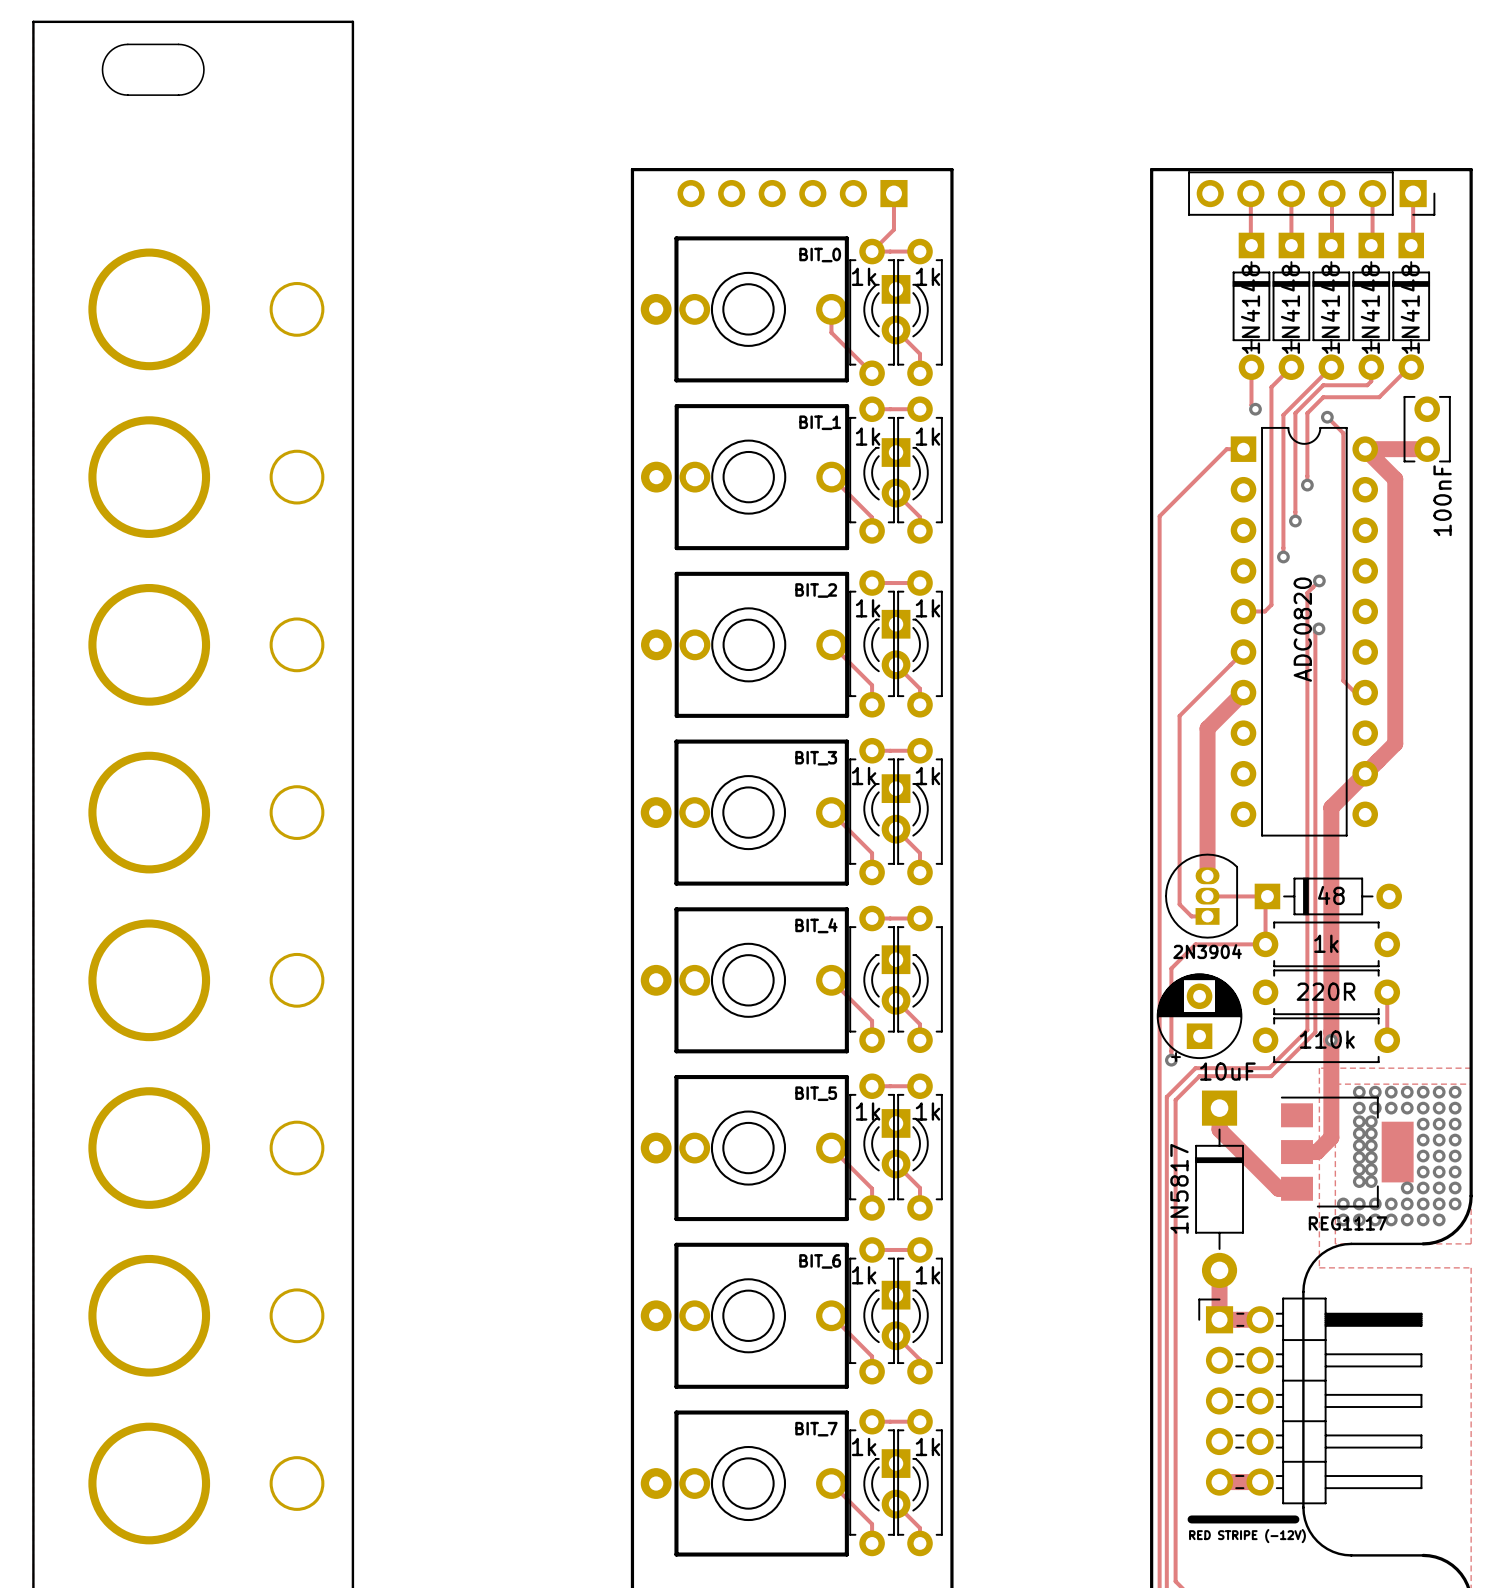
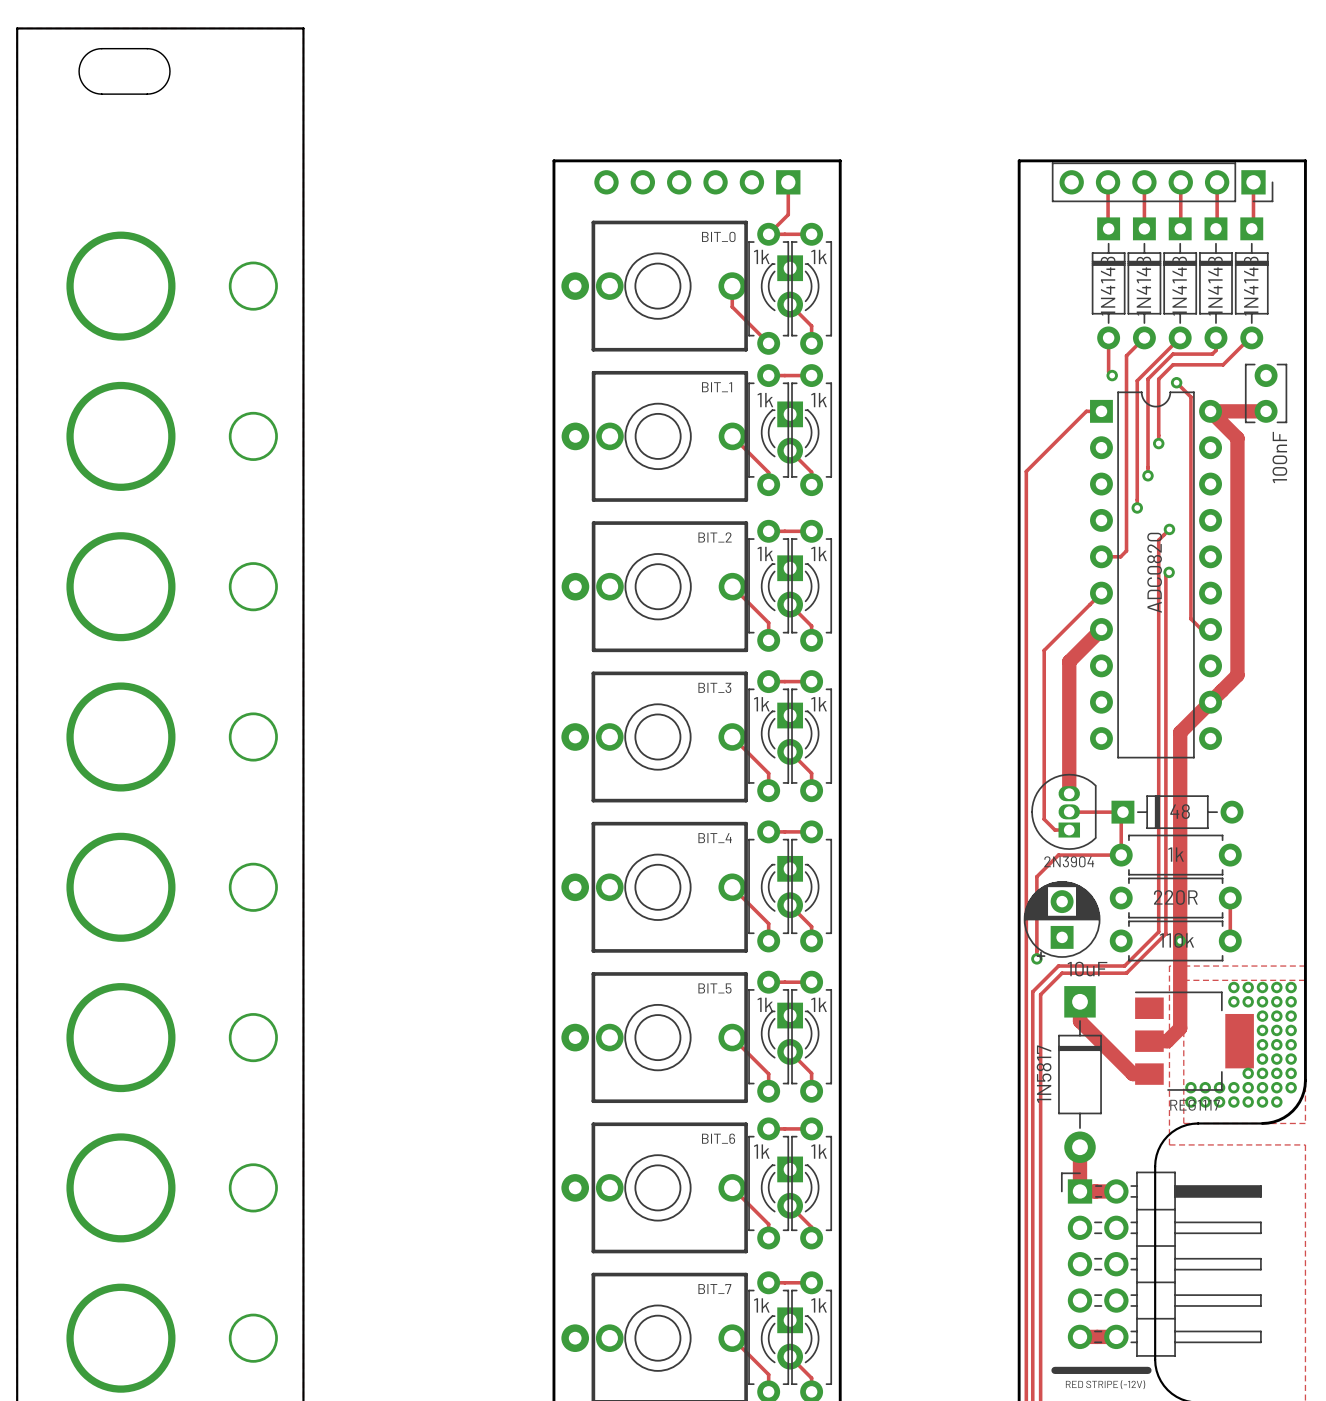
via: (1359, 1092) -> none
via: (1375, 1092) -> none
via: (1359, 1108) -> none
via: (1375, 1108) -> none
via: (1359, 1121) -> none
via: (1371, 1121) -> none
via: (1359, 1133) -> none
via: (1371, 1133) -> none
via: (1359, 1145) -> none
via: (1371, 1145) -> none
via: (1359, 1157) -> none
via: (1371, 1157) -> none
via: (1359, 1169) -> none
via: (1371, 1169) -> none
via: (1359, 1181) -> none
via: (1371, 1181) -> none

